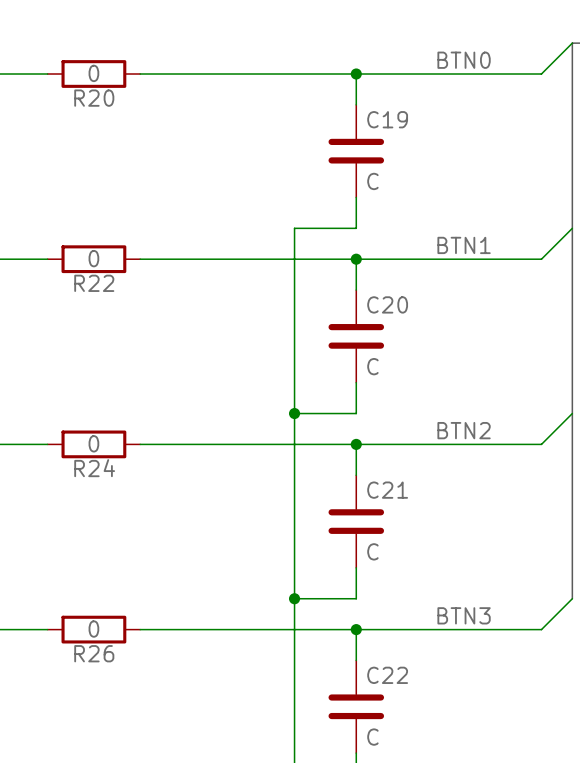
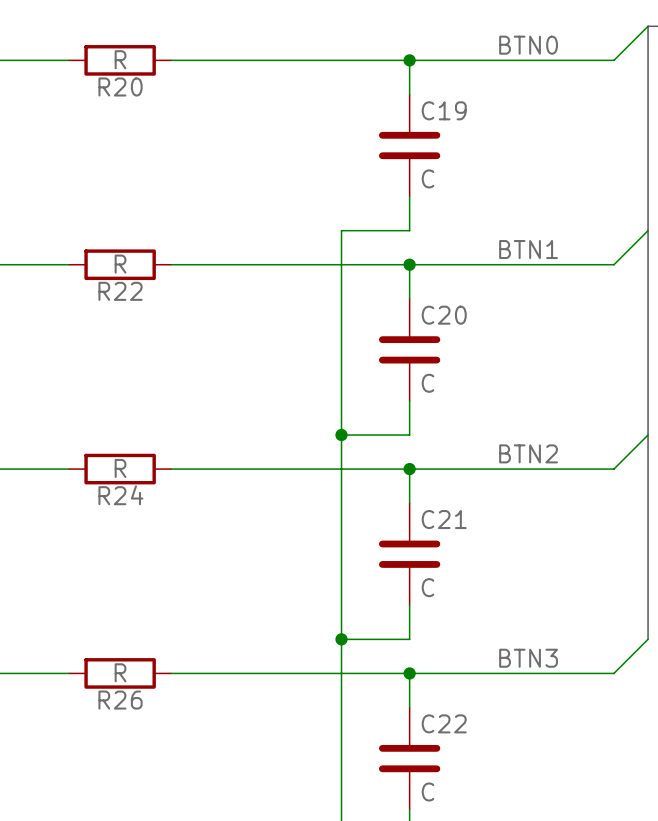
R20 value: 0 (93, 73) -> R (120, 59)
R22 value: 0 (93, 258) -> R (120, 264)
R24 value: 0 (93, 443) -> R (120, 468)
R26 value: 0 (93, 629) -> R (120, 672)

